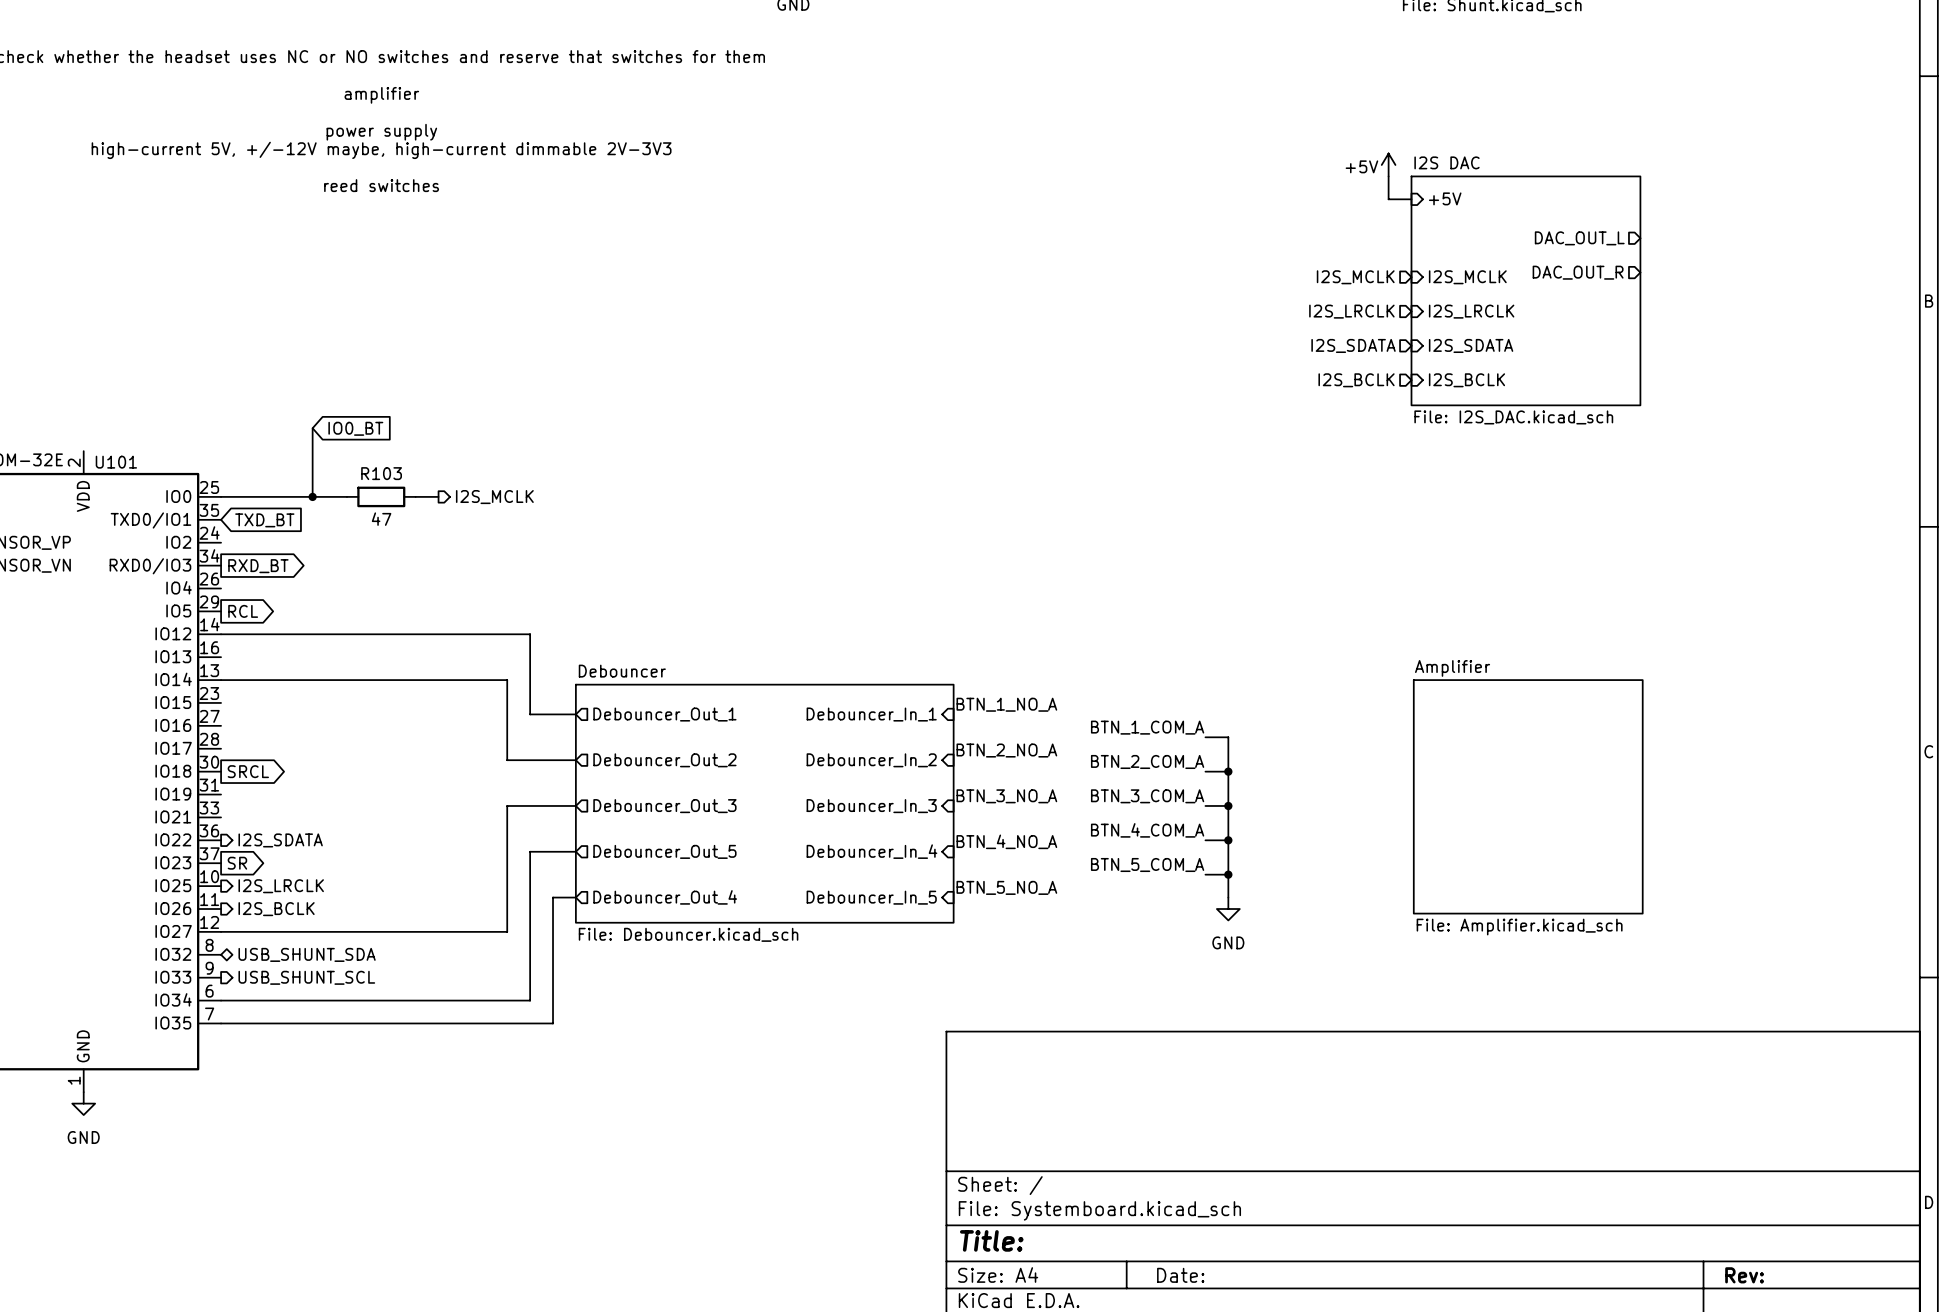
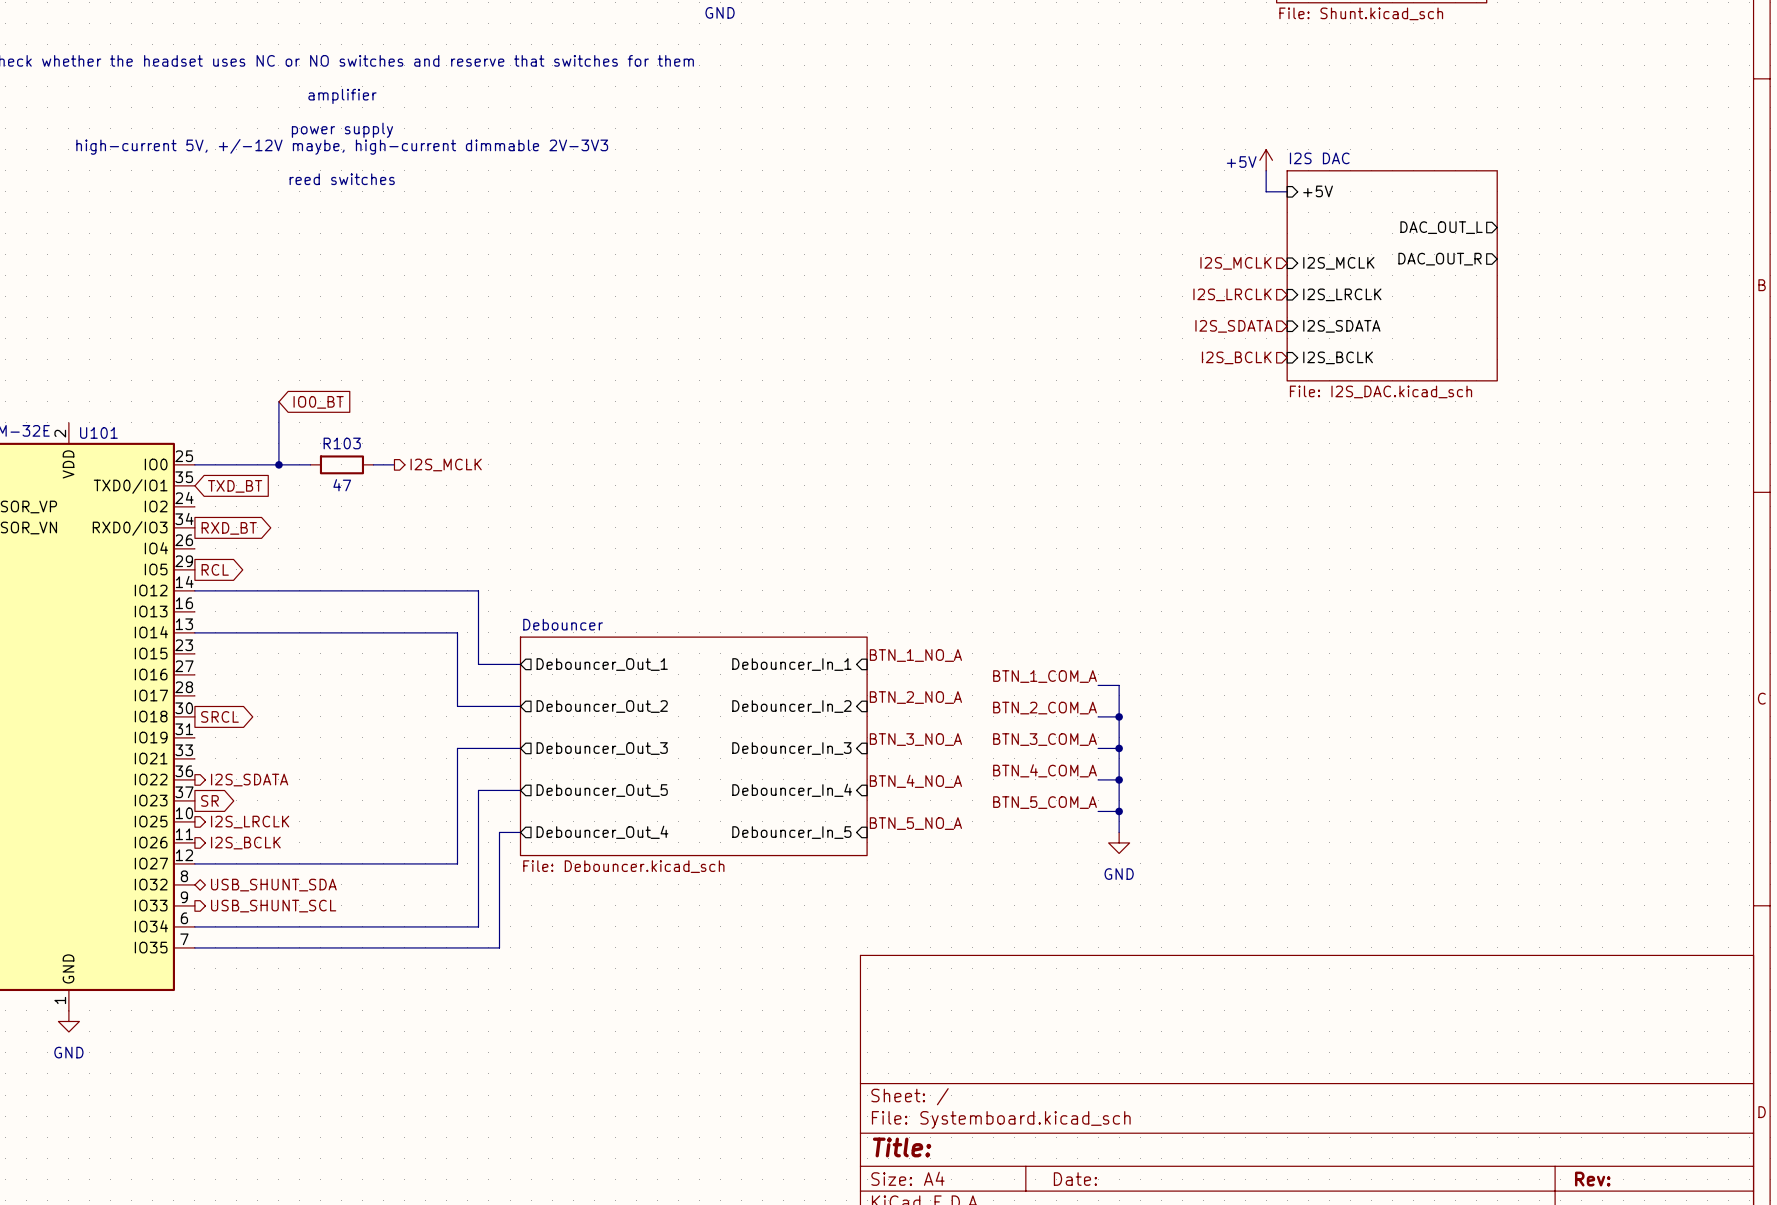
sheet Amplifier: File: Amplifier.kicad_sch (1528, 796) -> none

